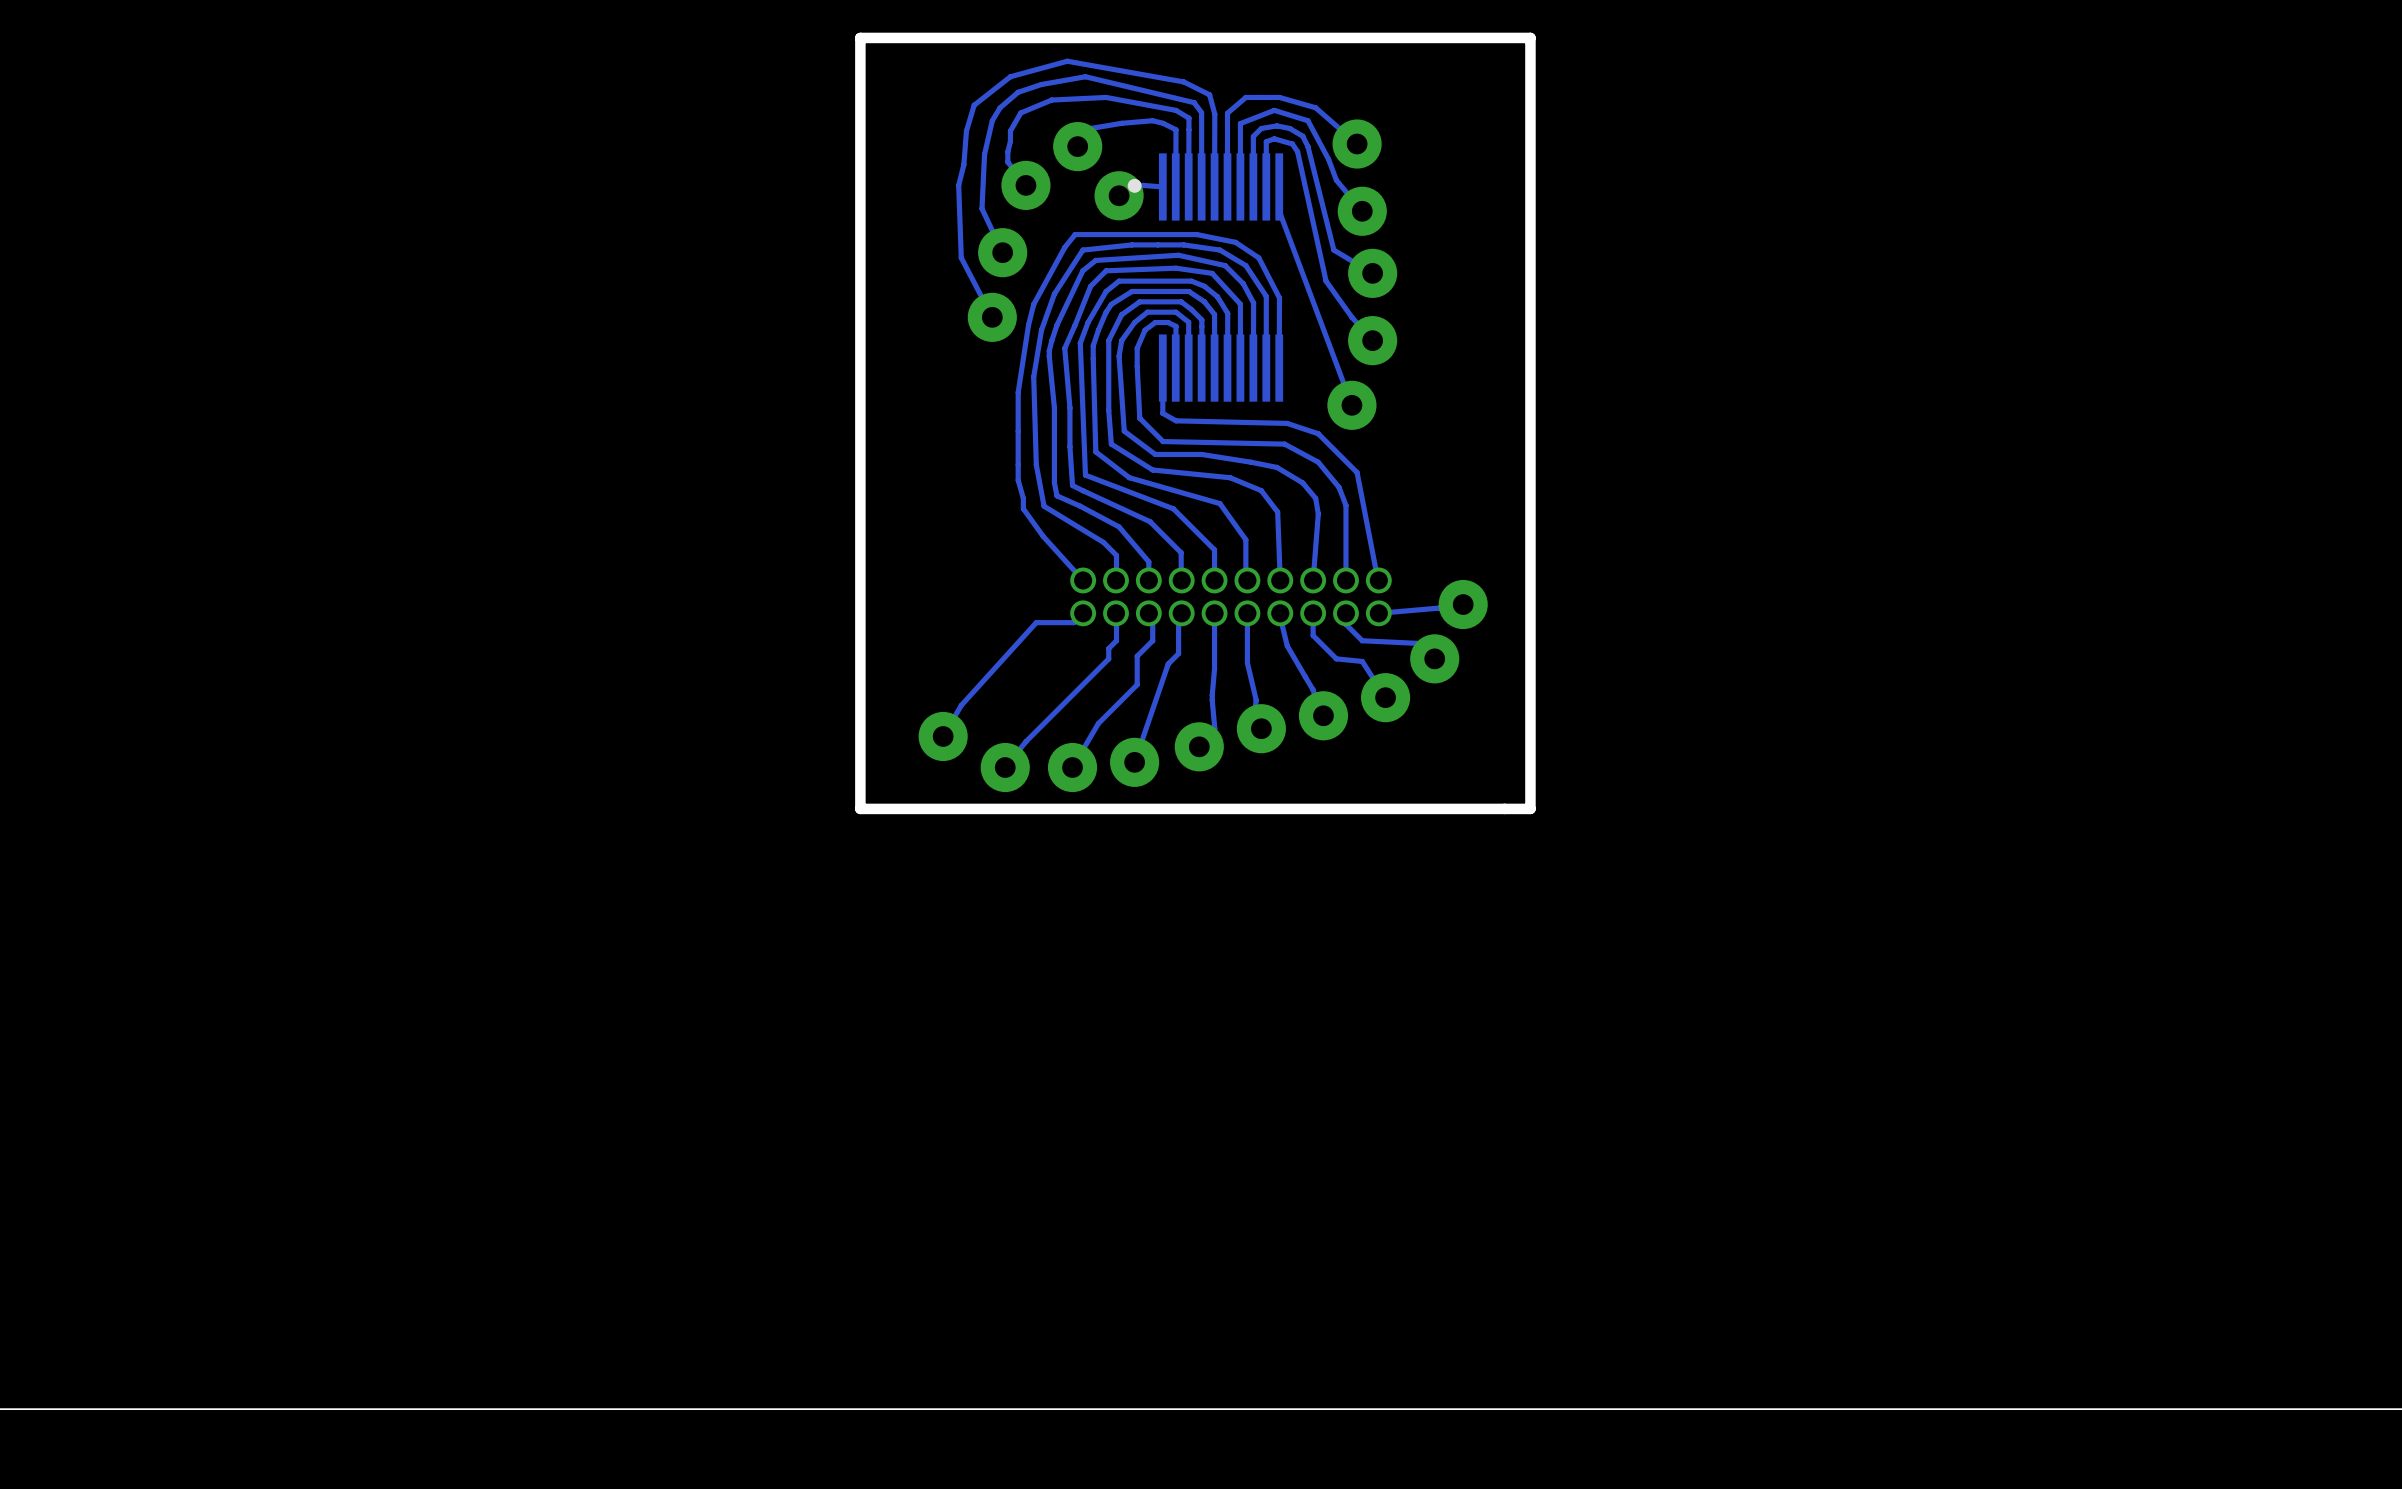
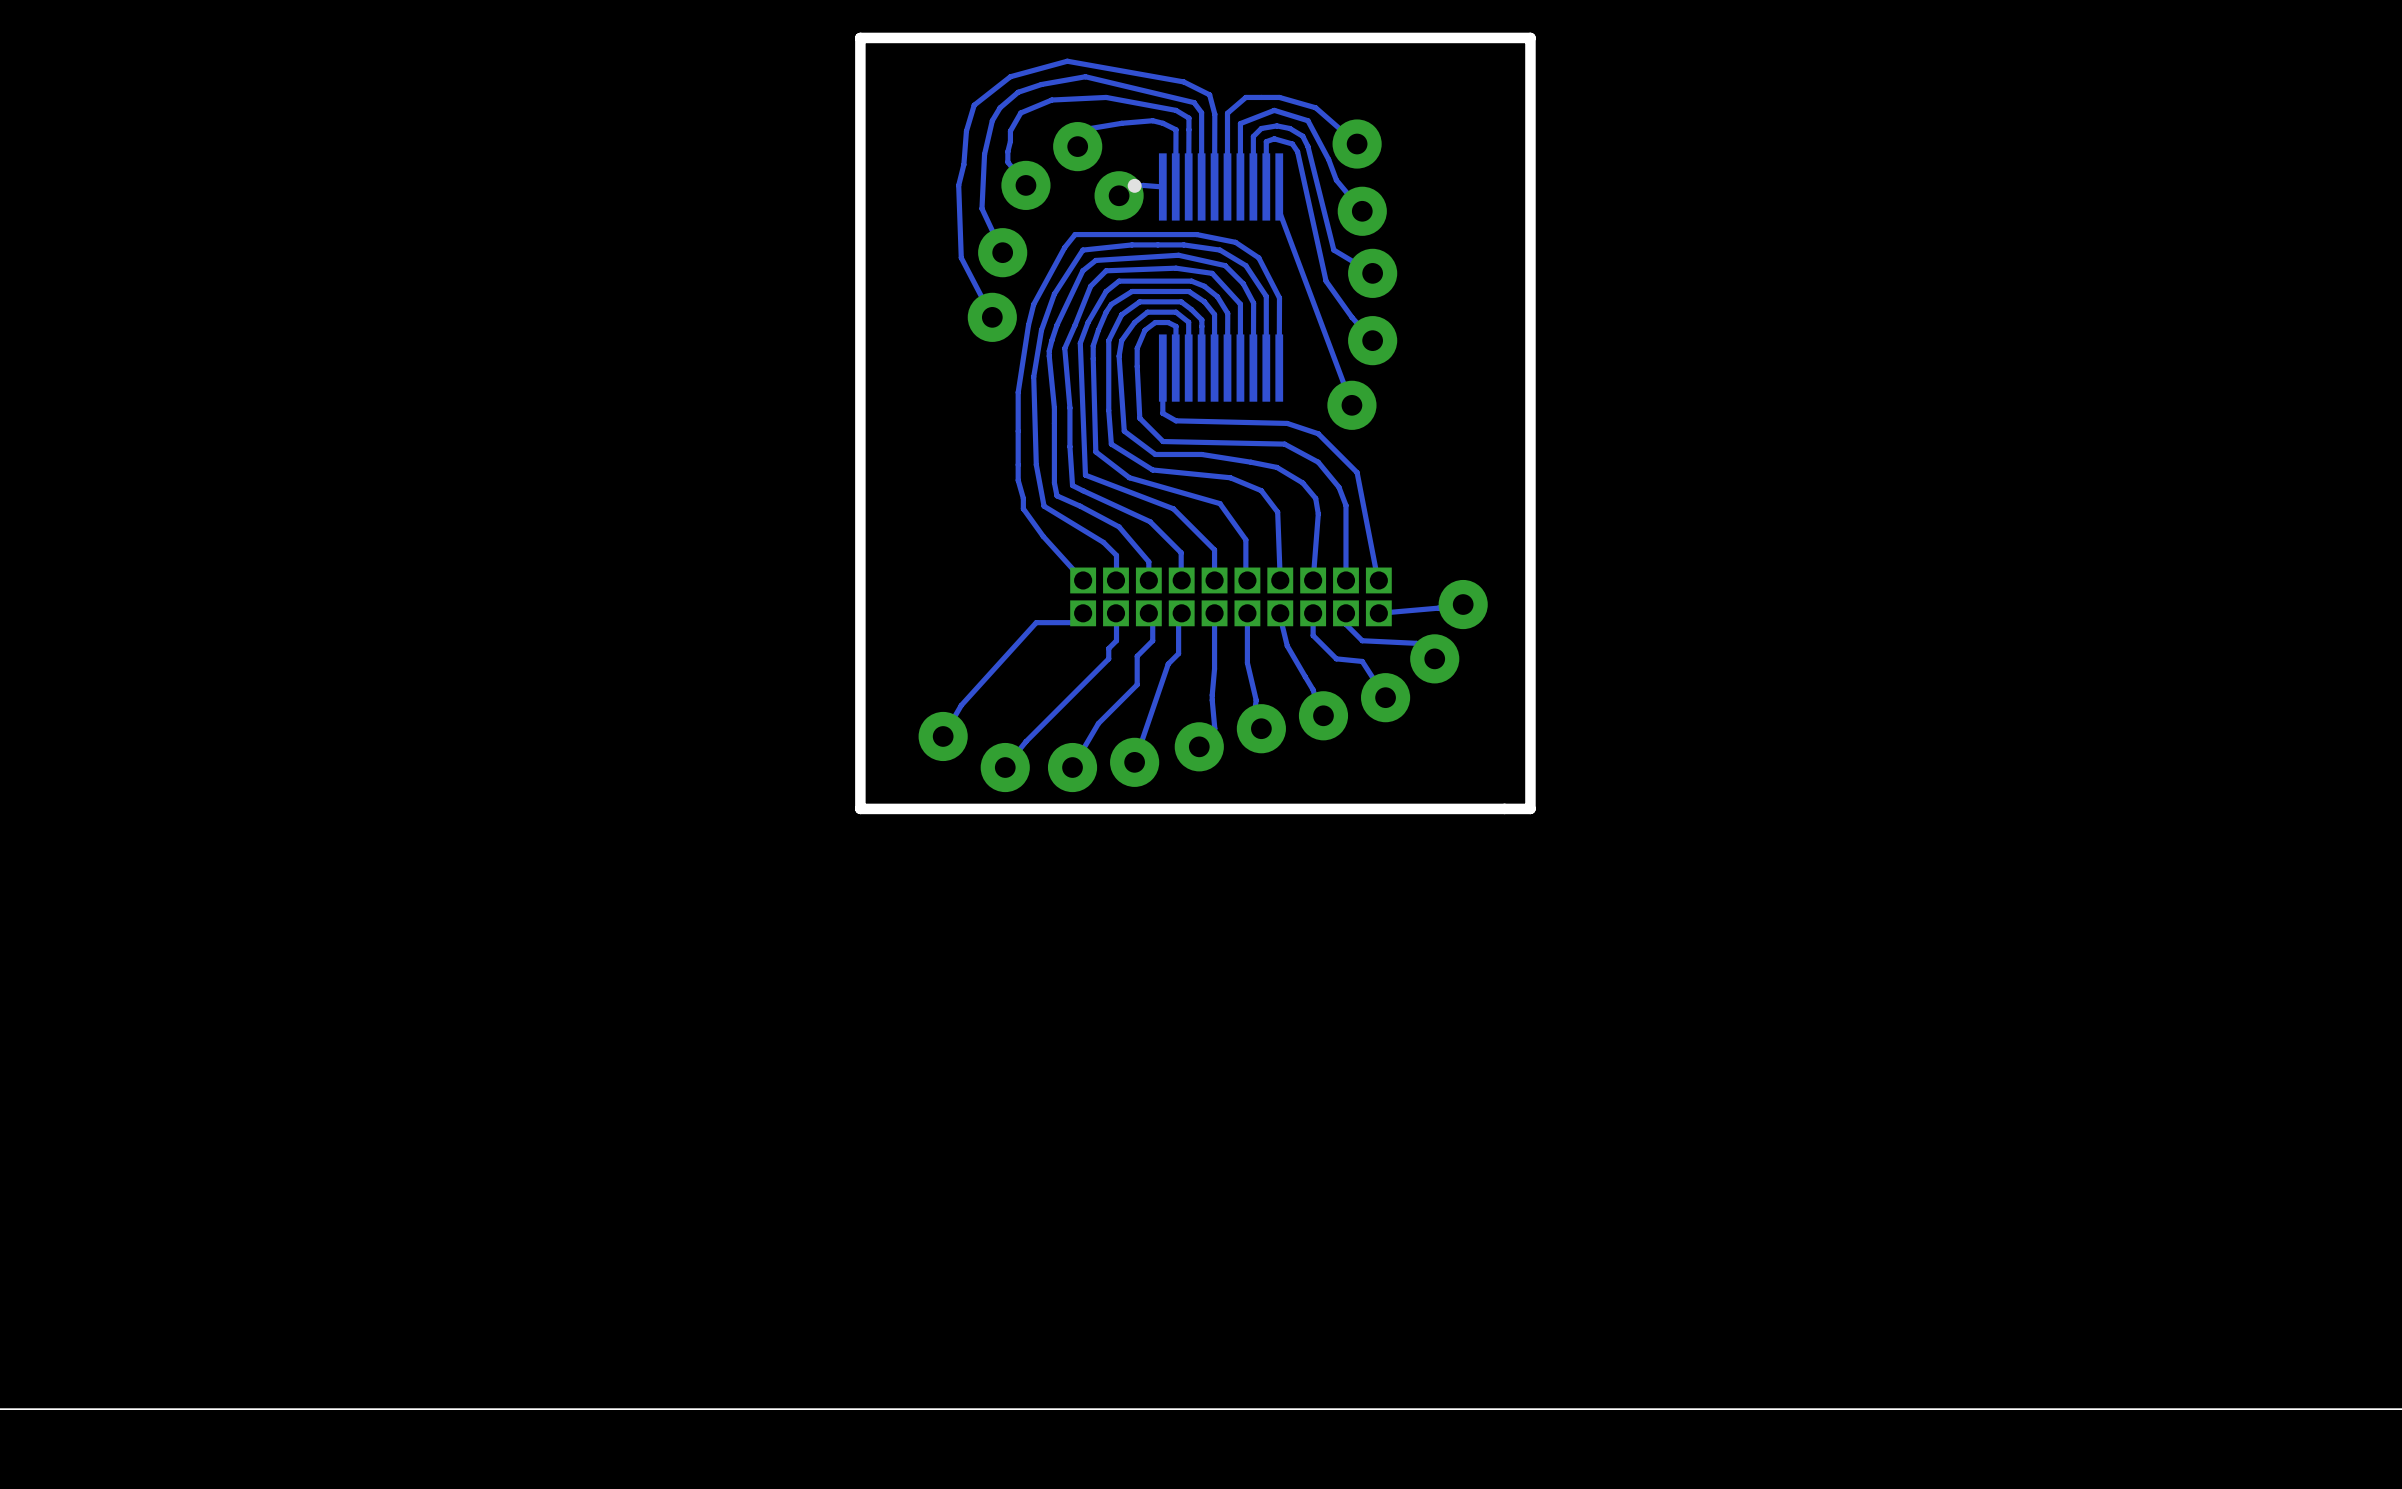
part footprint: [1070, 567, 1392, 627] -> [1070, 567, 1392, 627]

